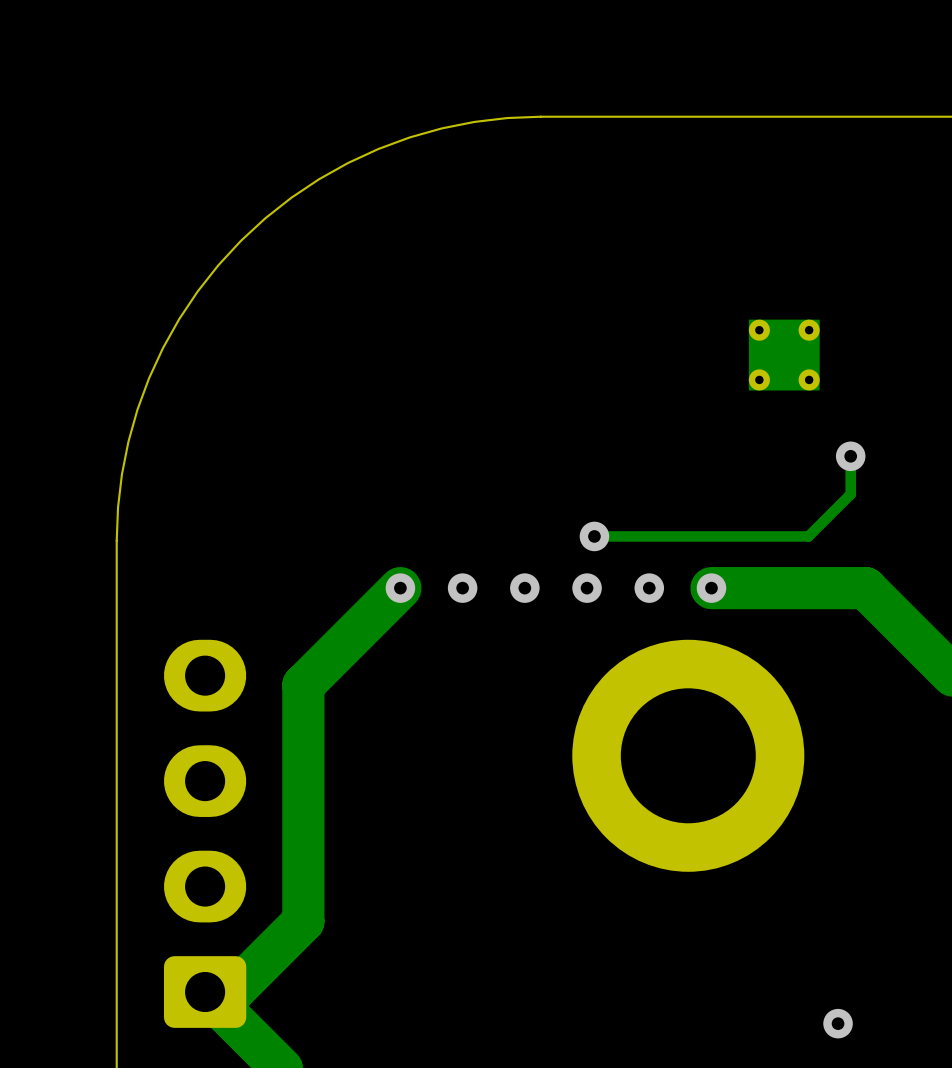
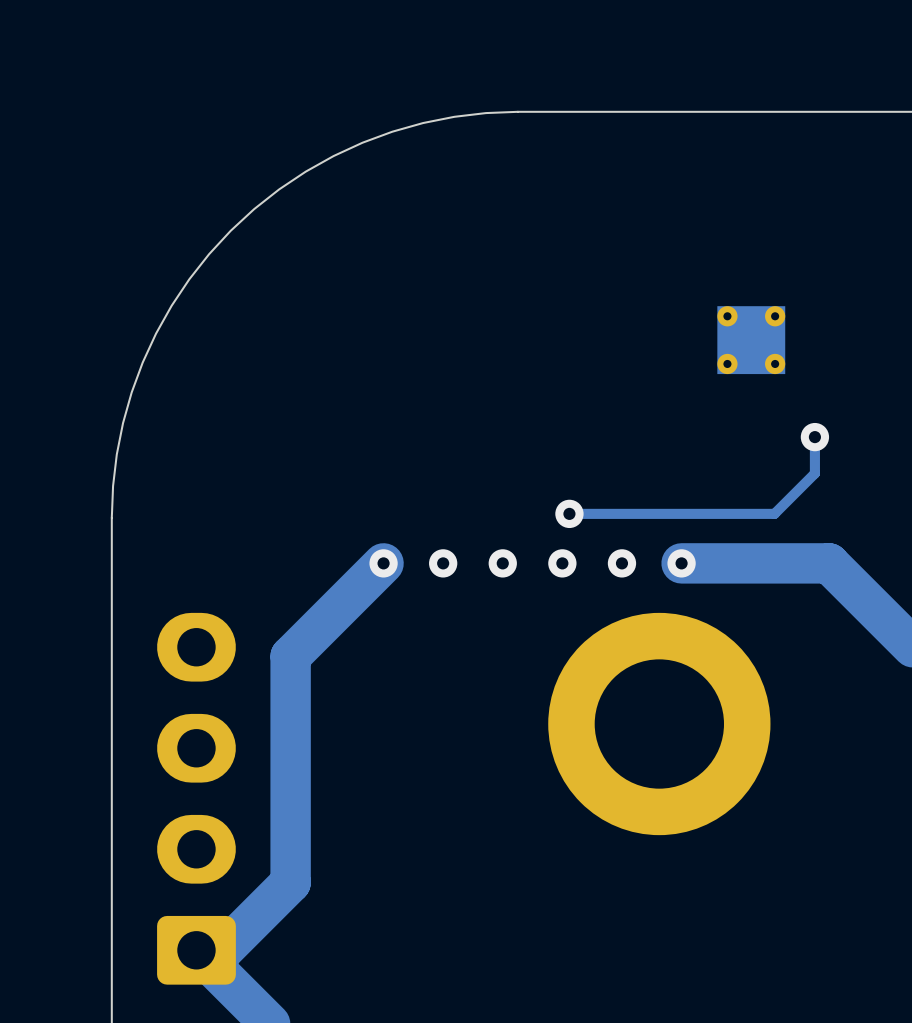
via: (838, 1023) -> none

